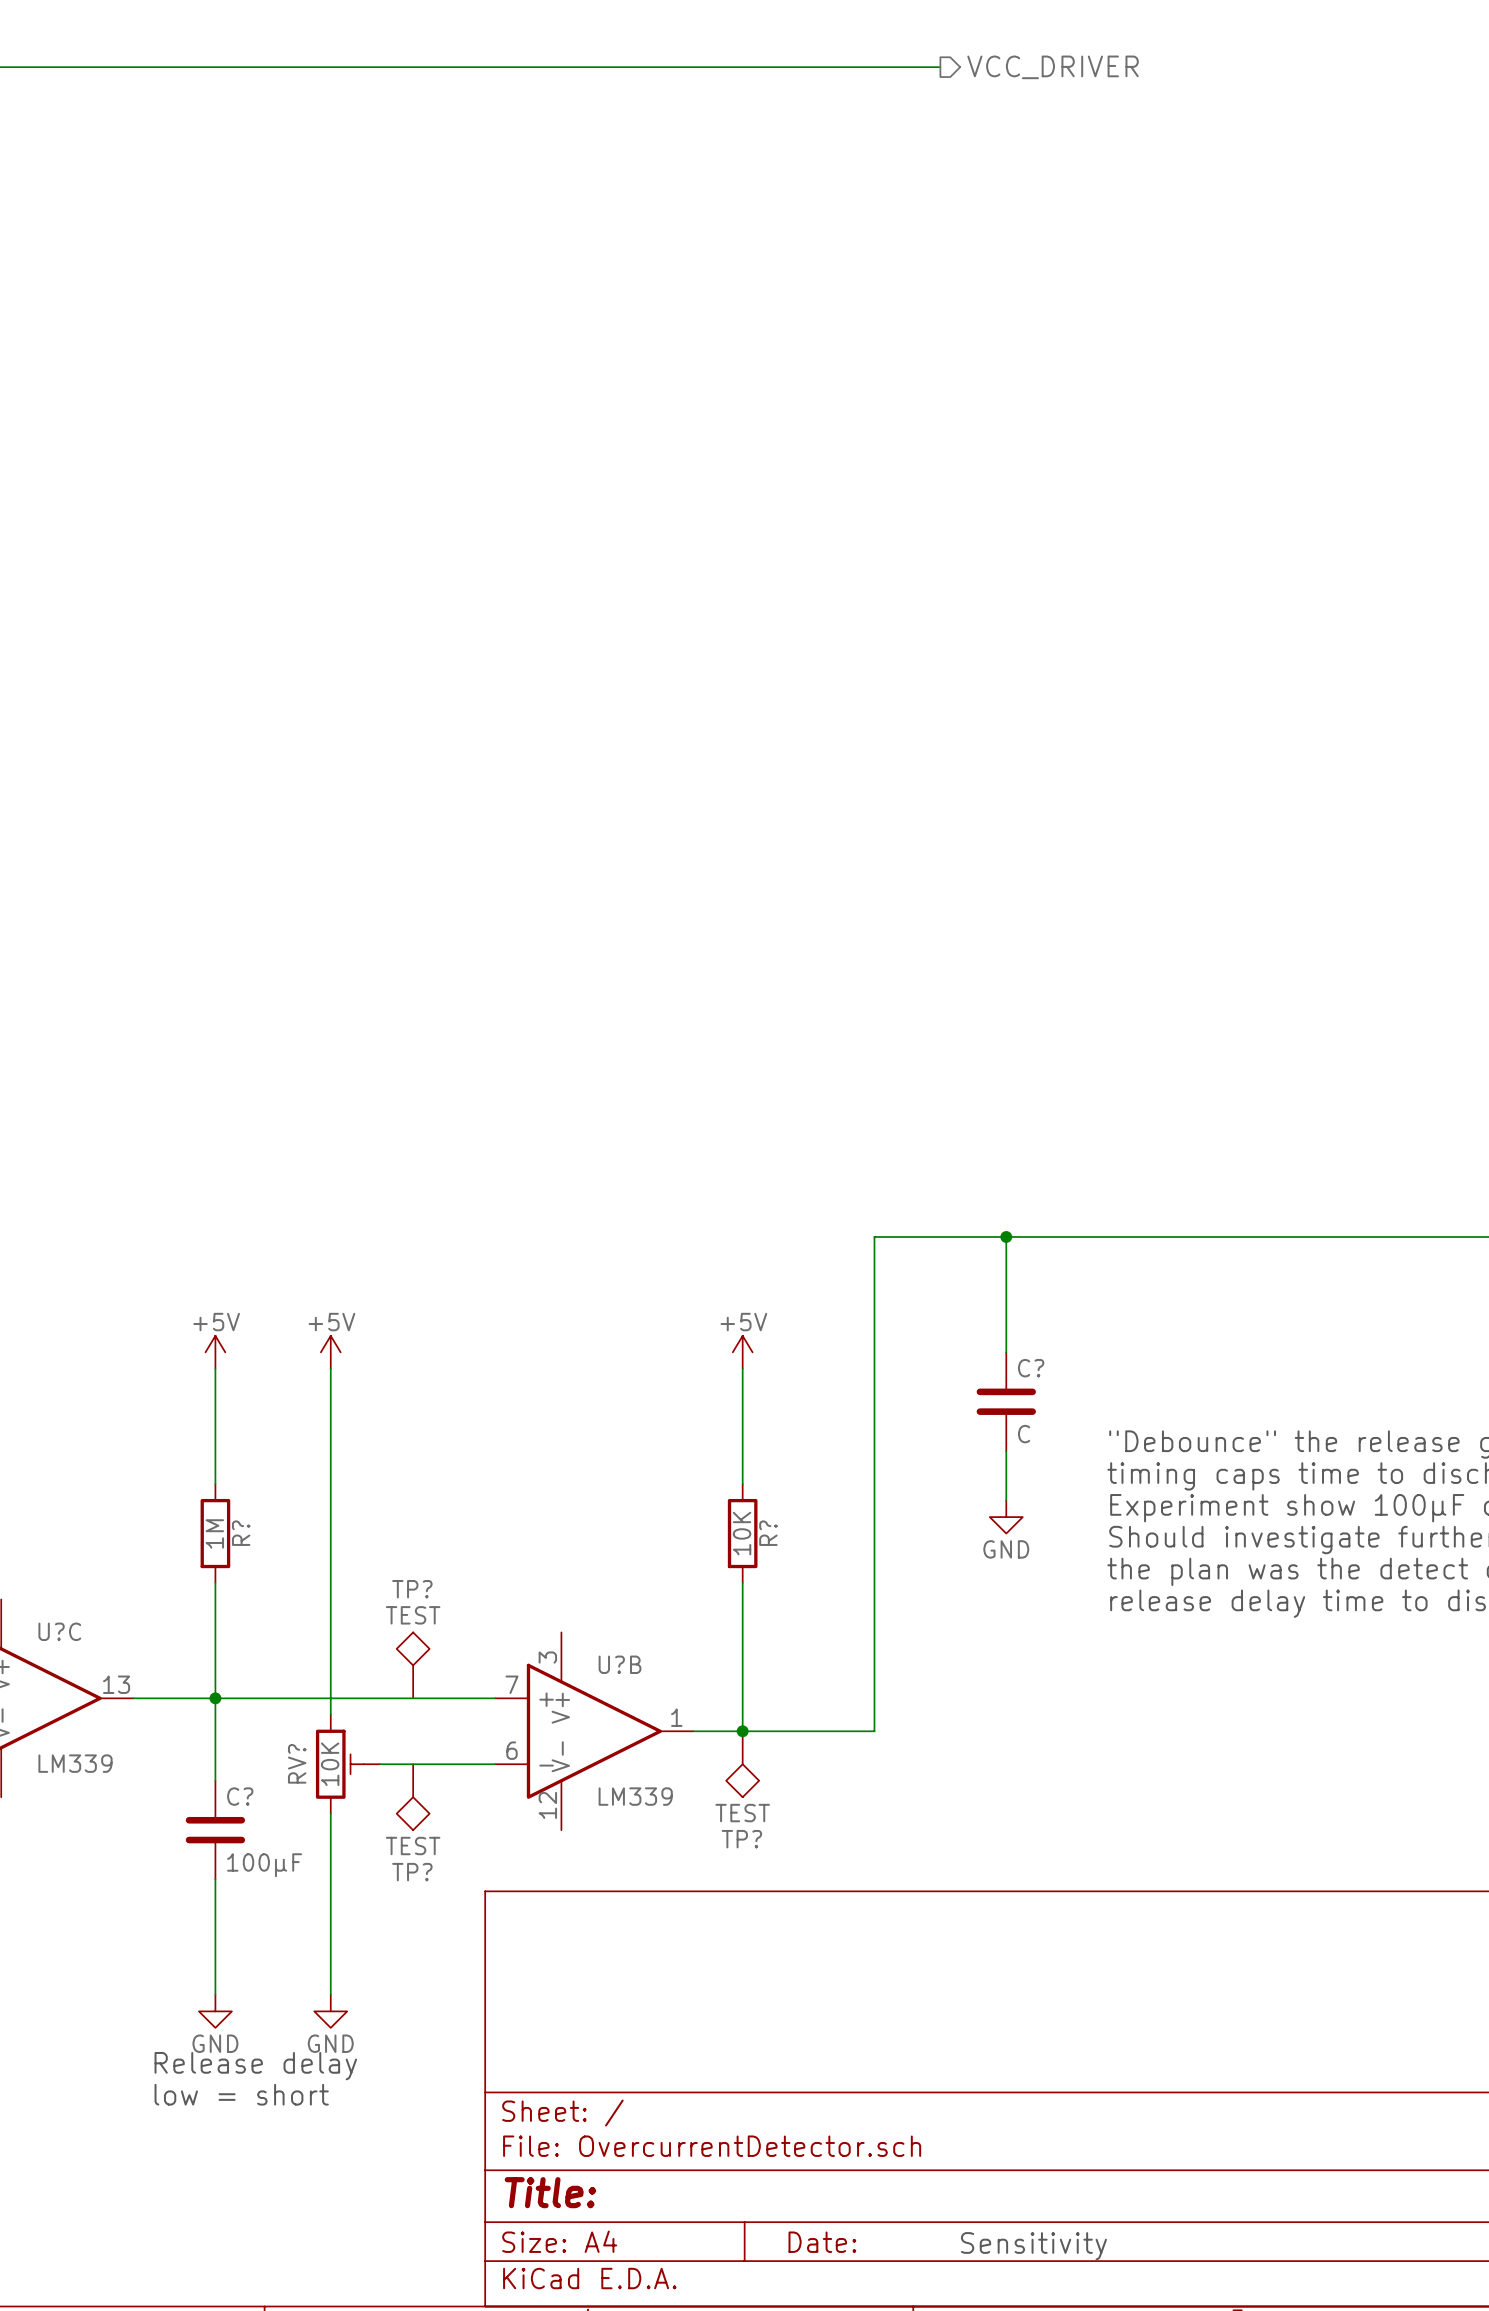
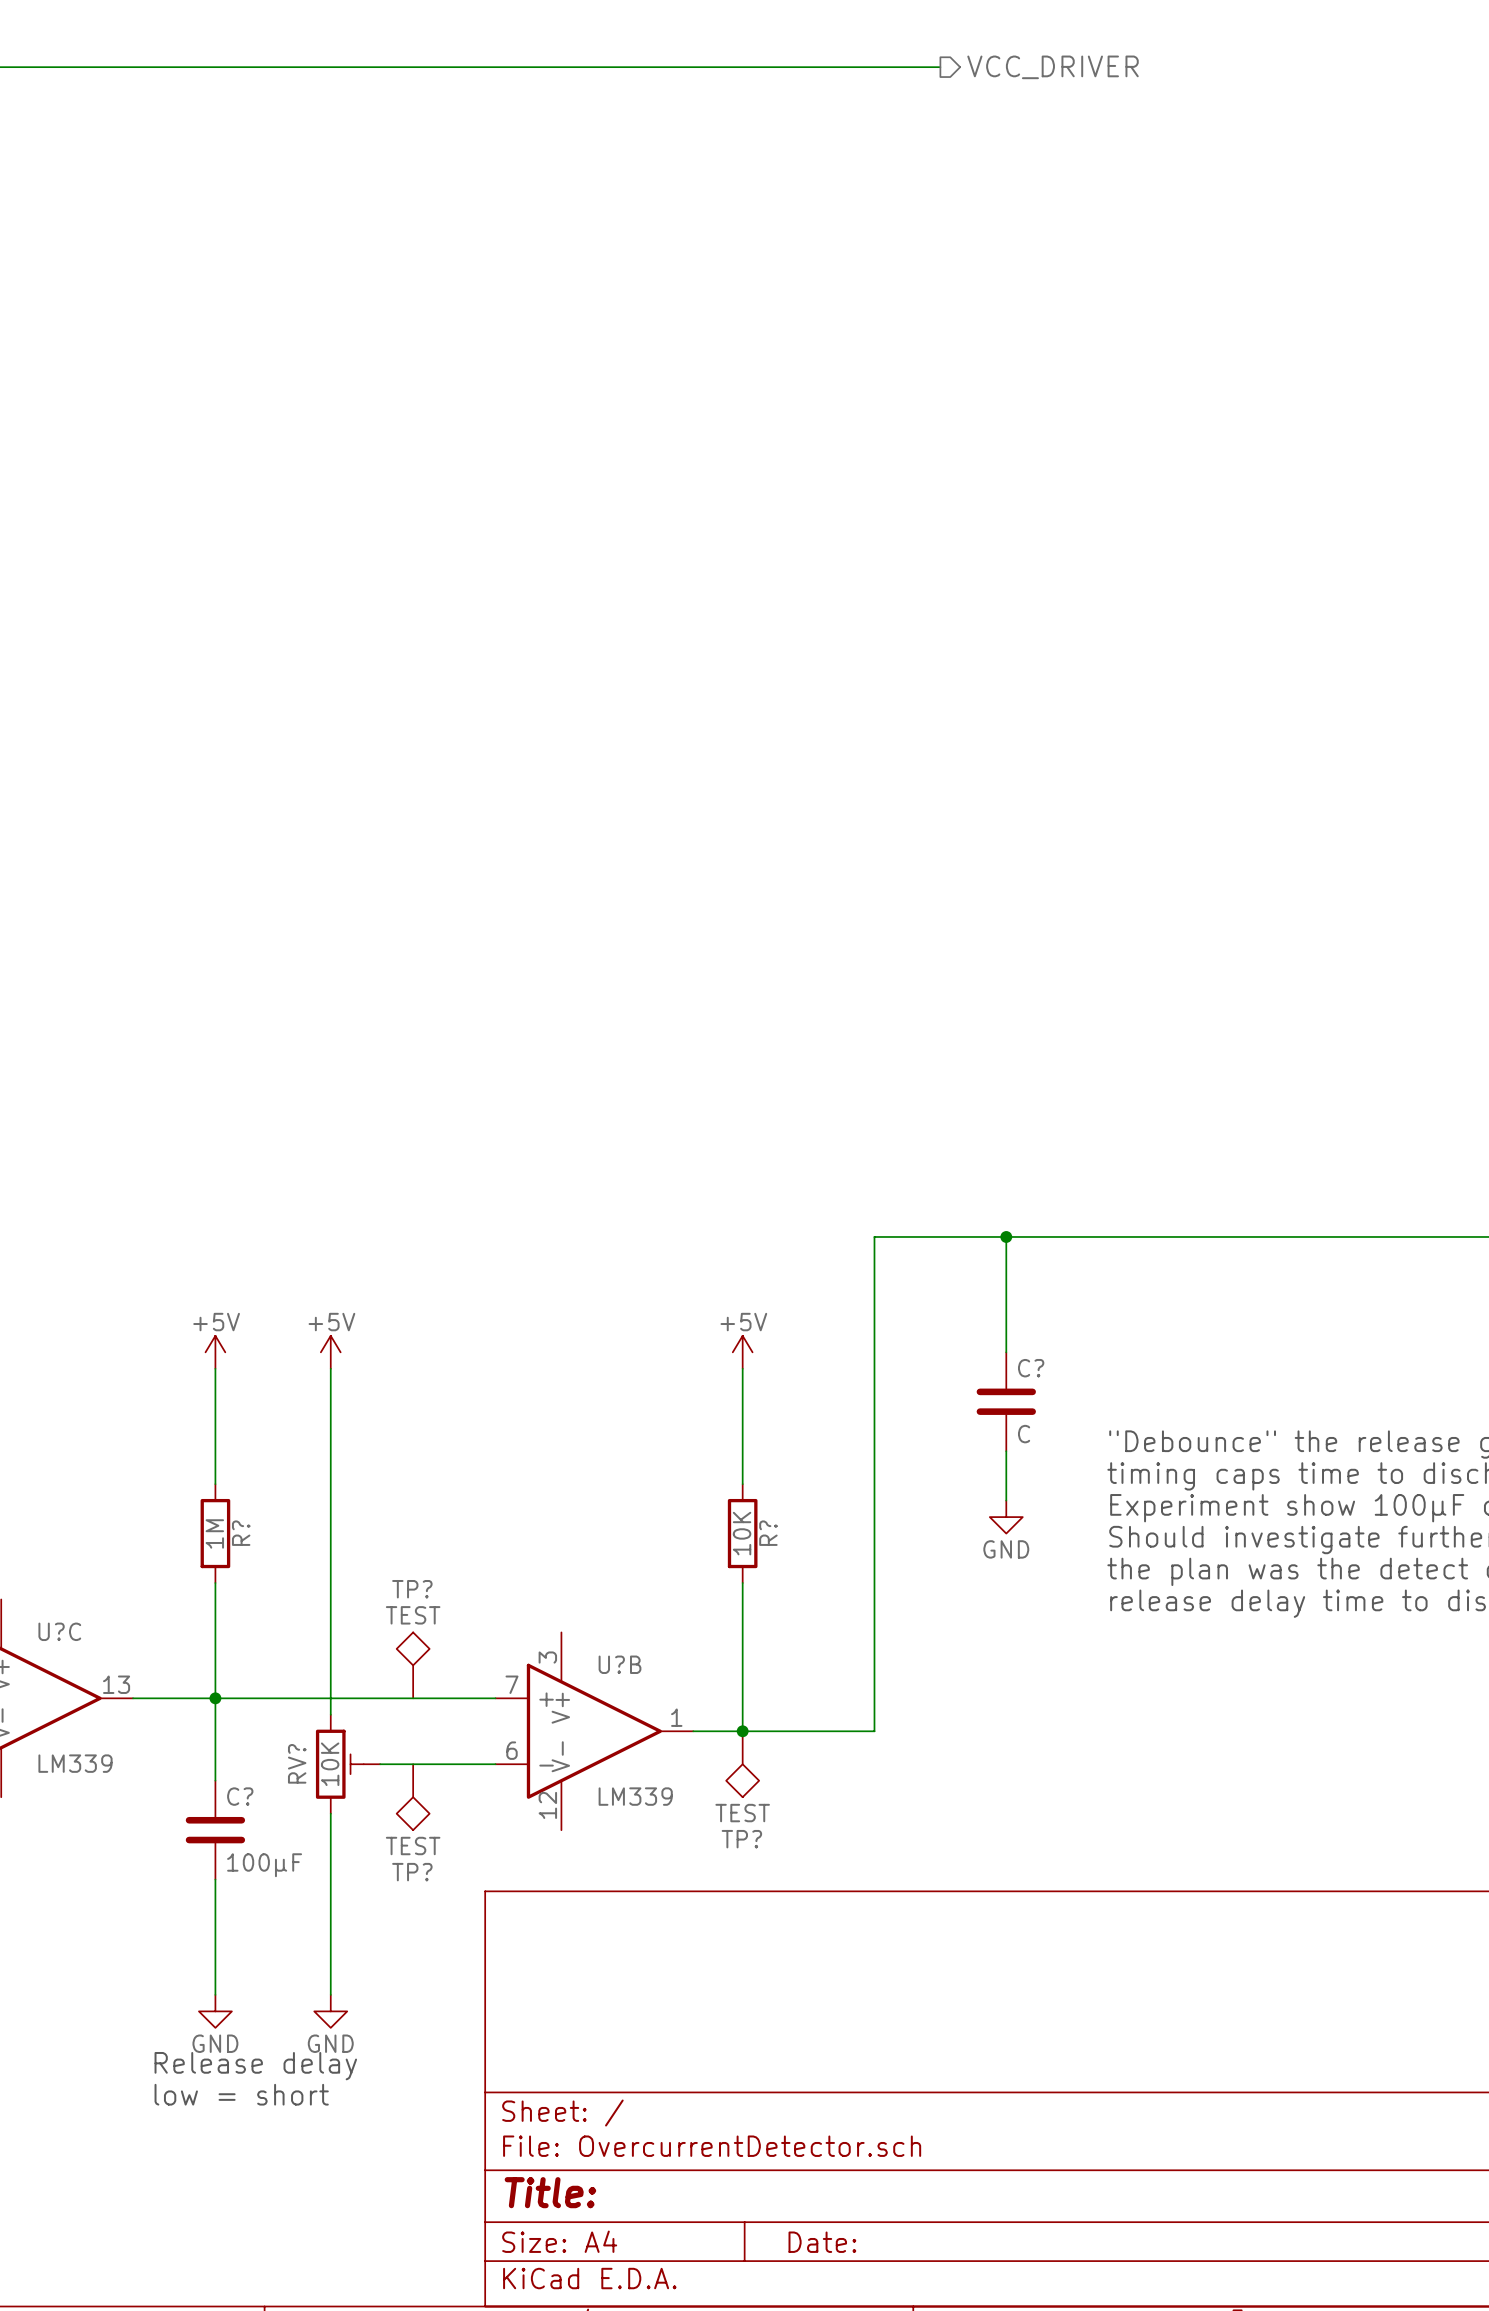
text: Sensitivity (1033, 2246) -> none

